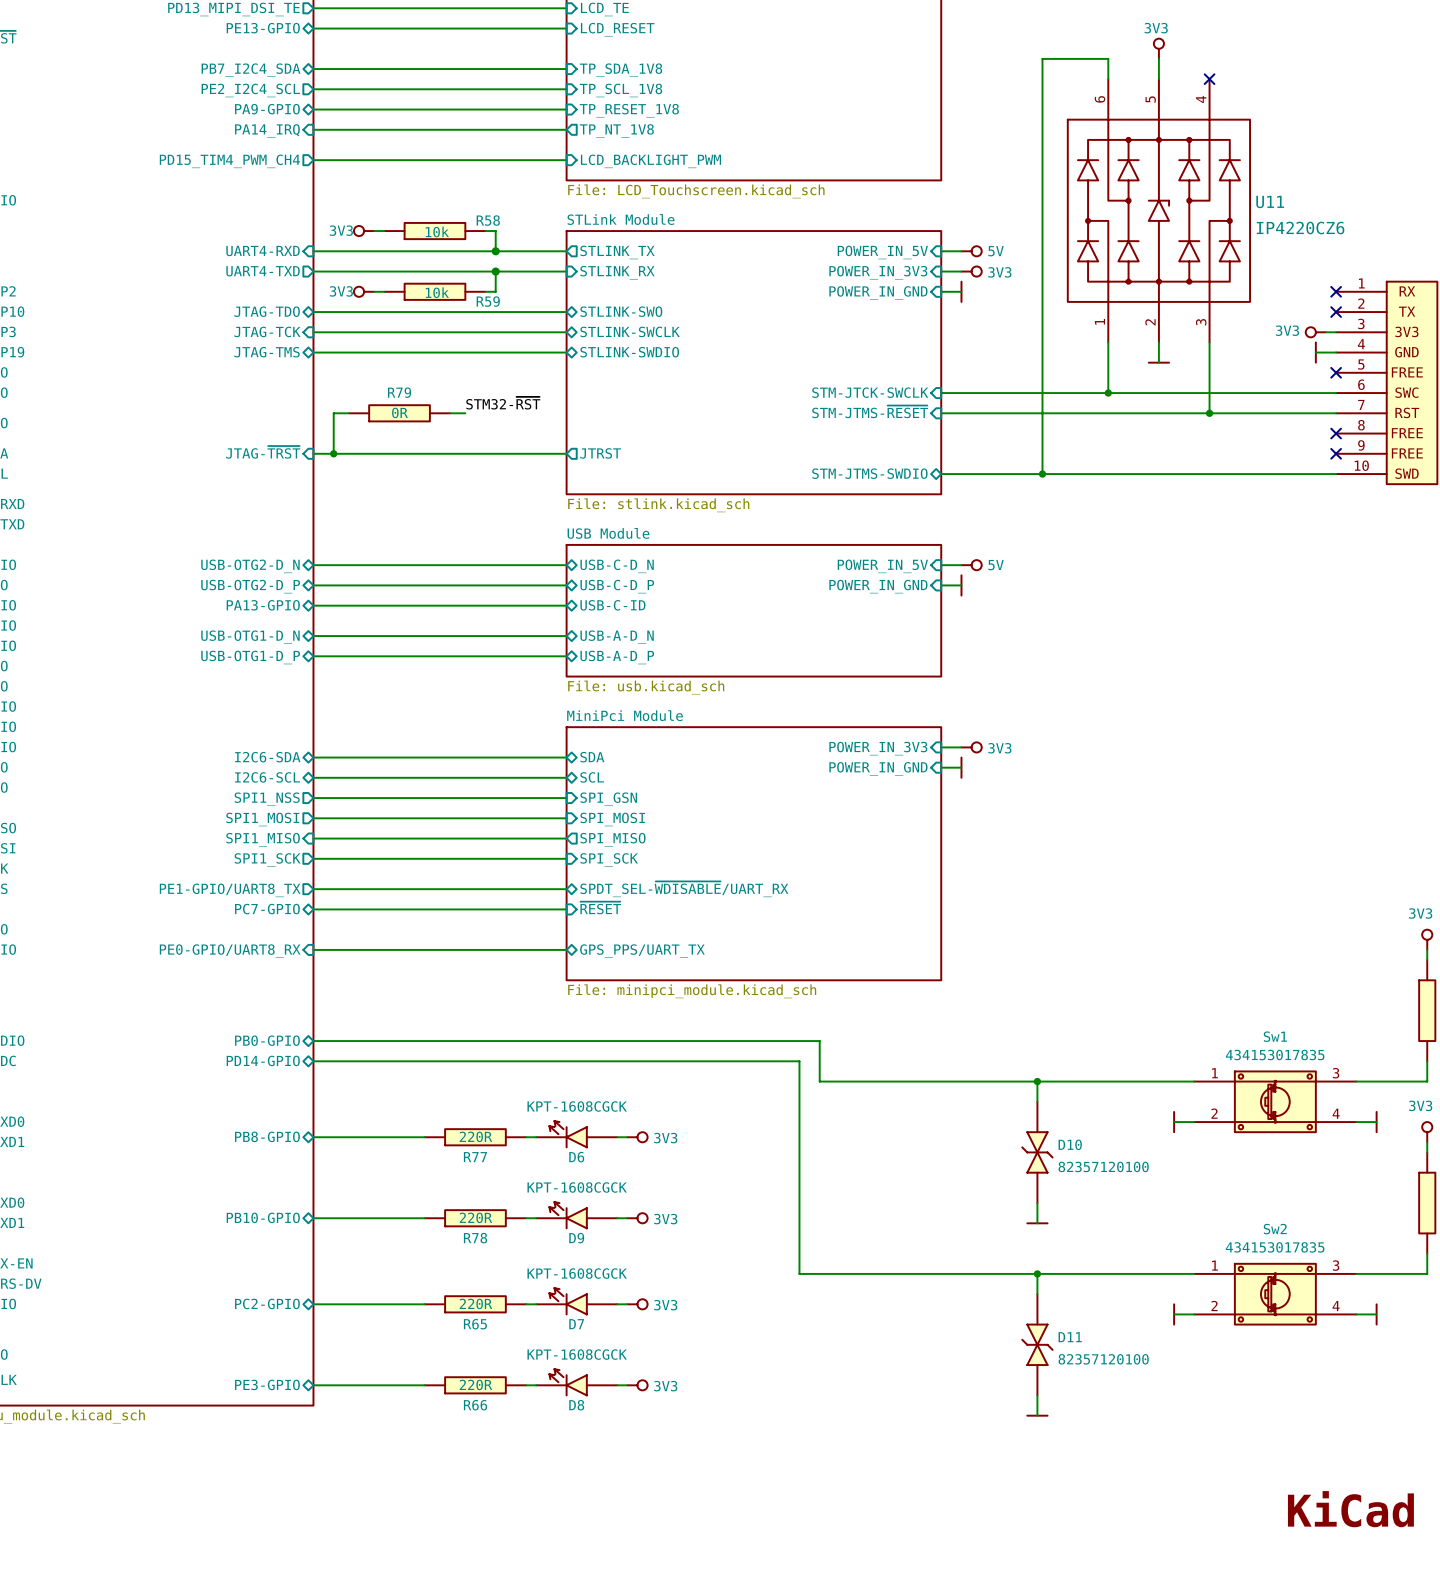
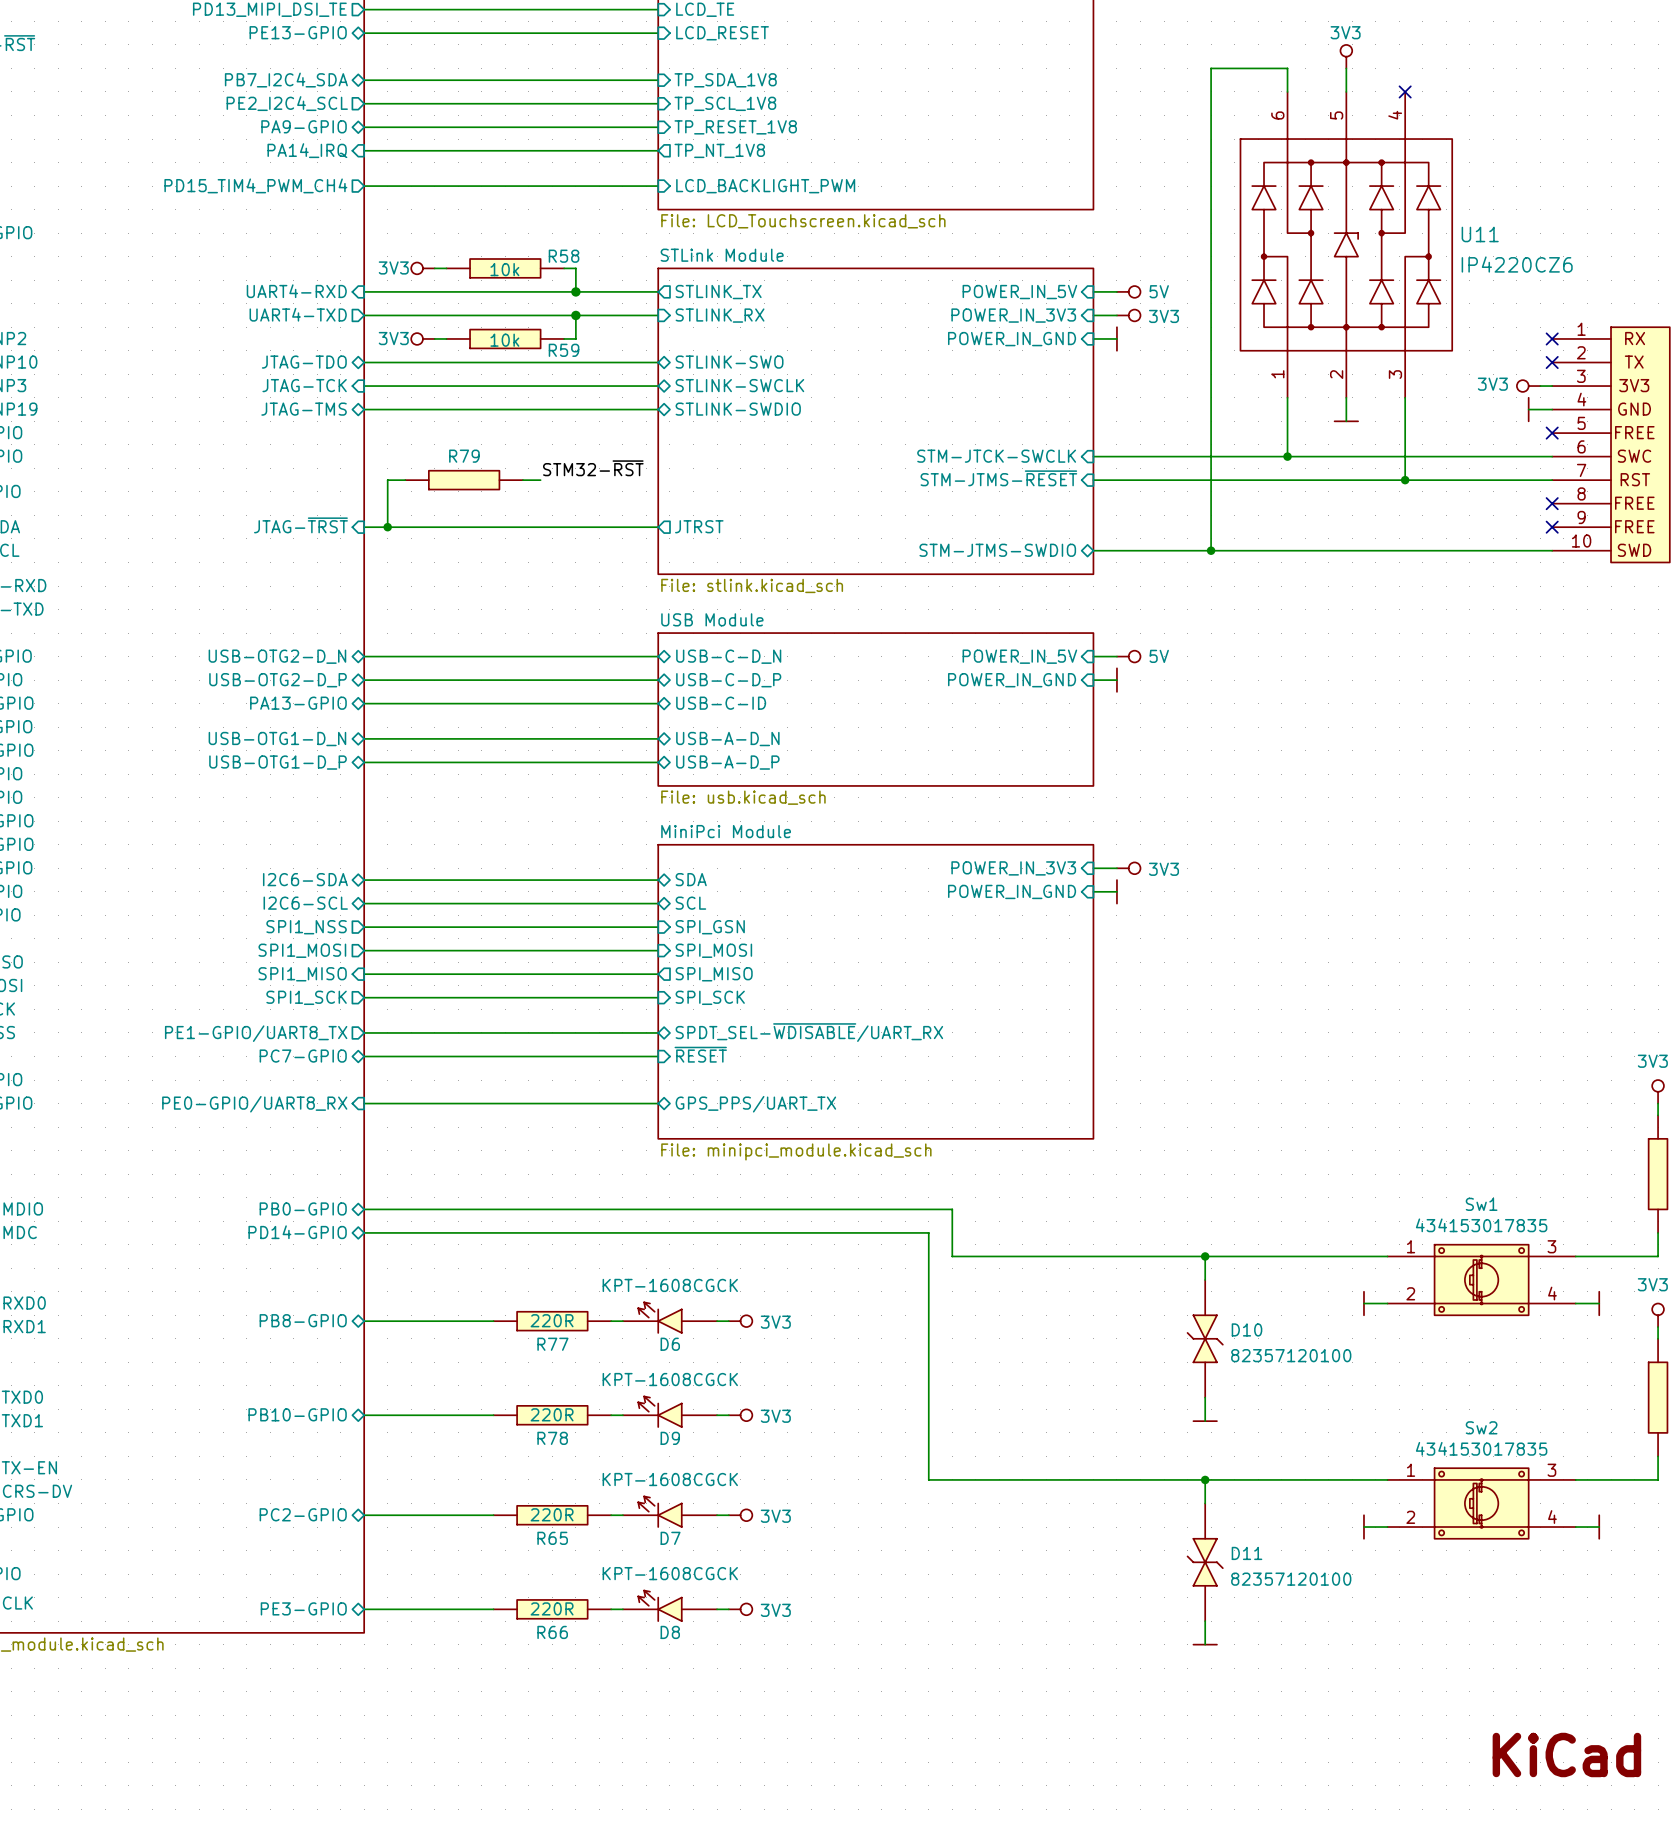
R79 value: 0R (399, 412) -> none

